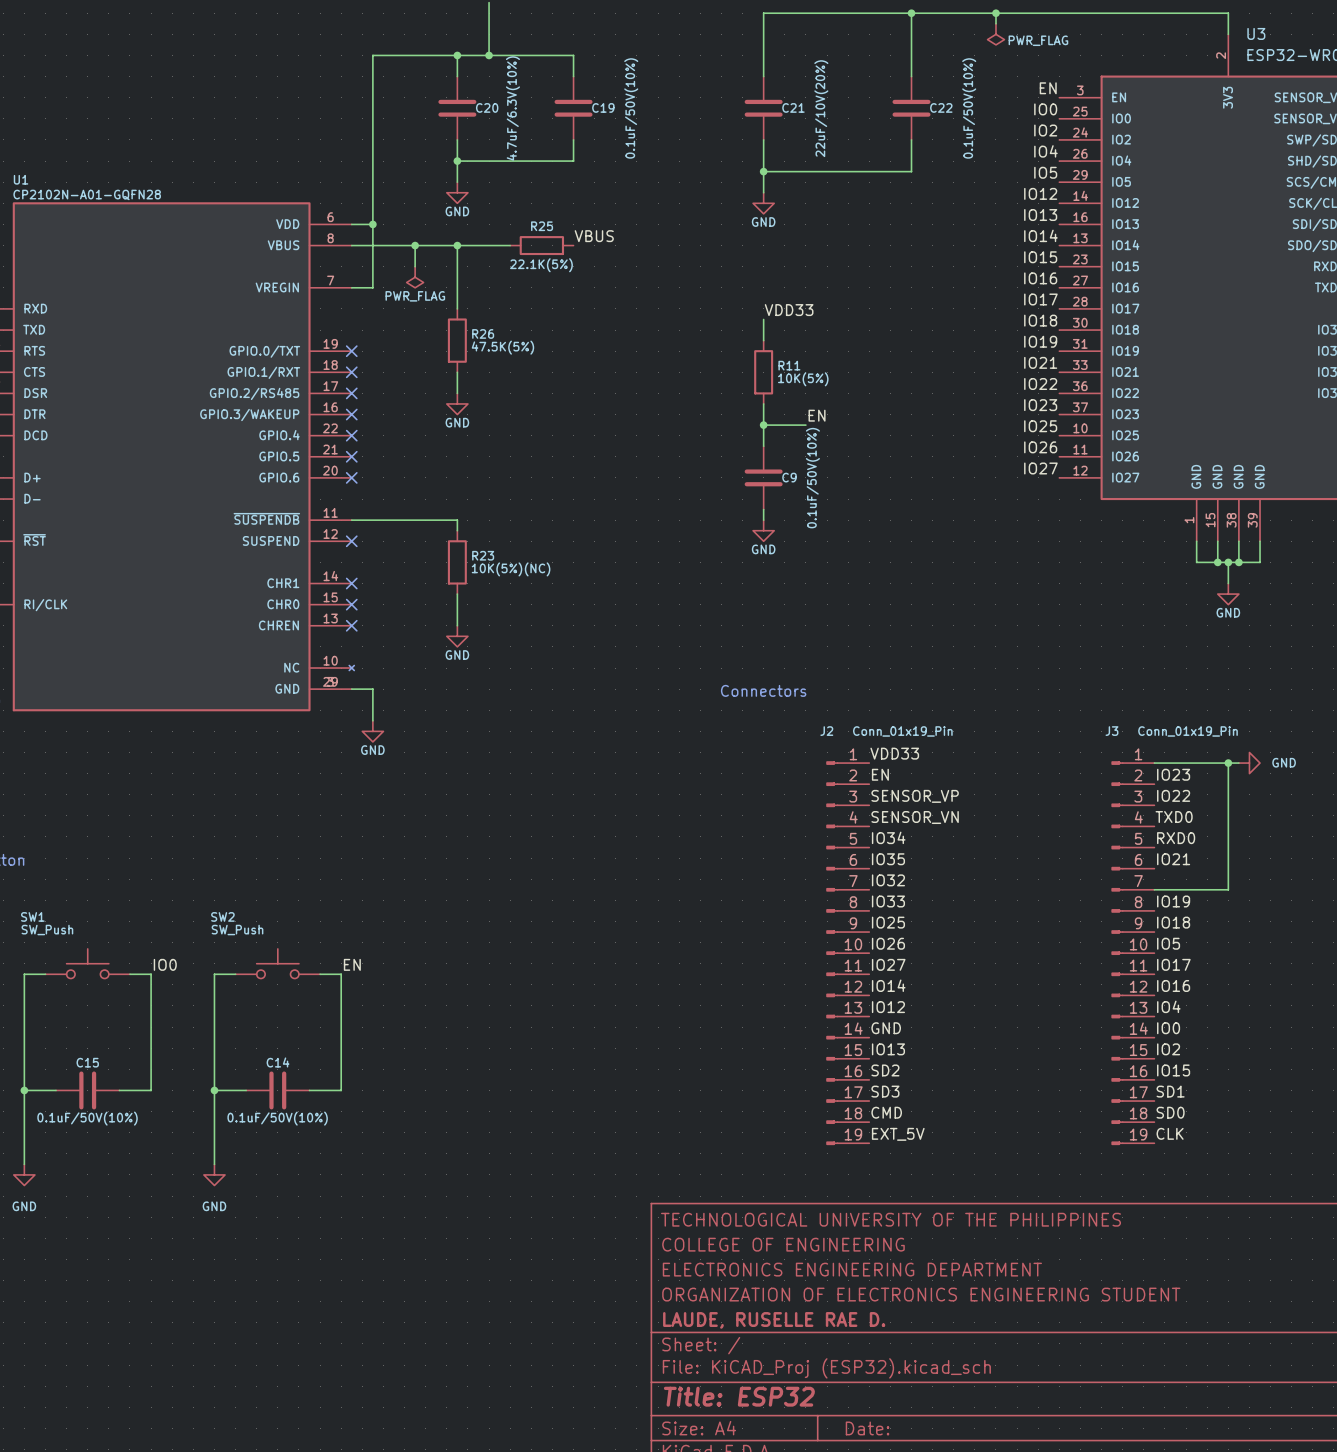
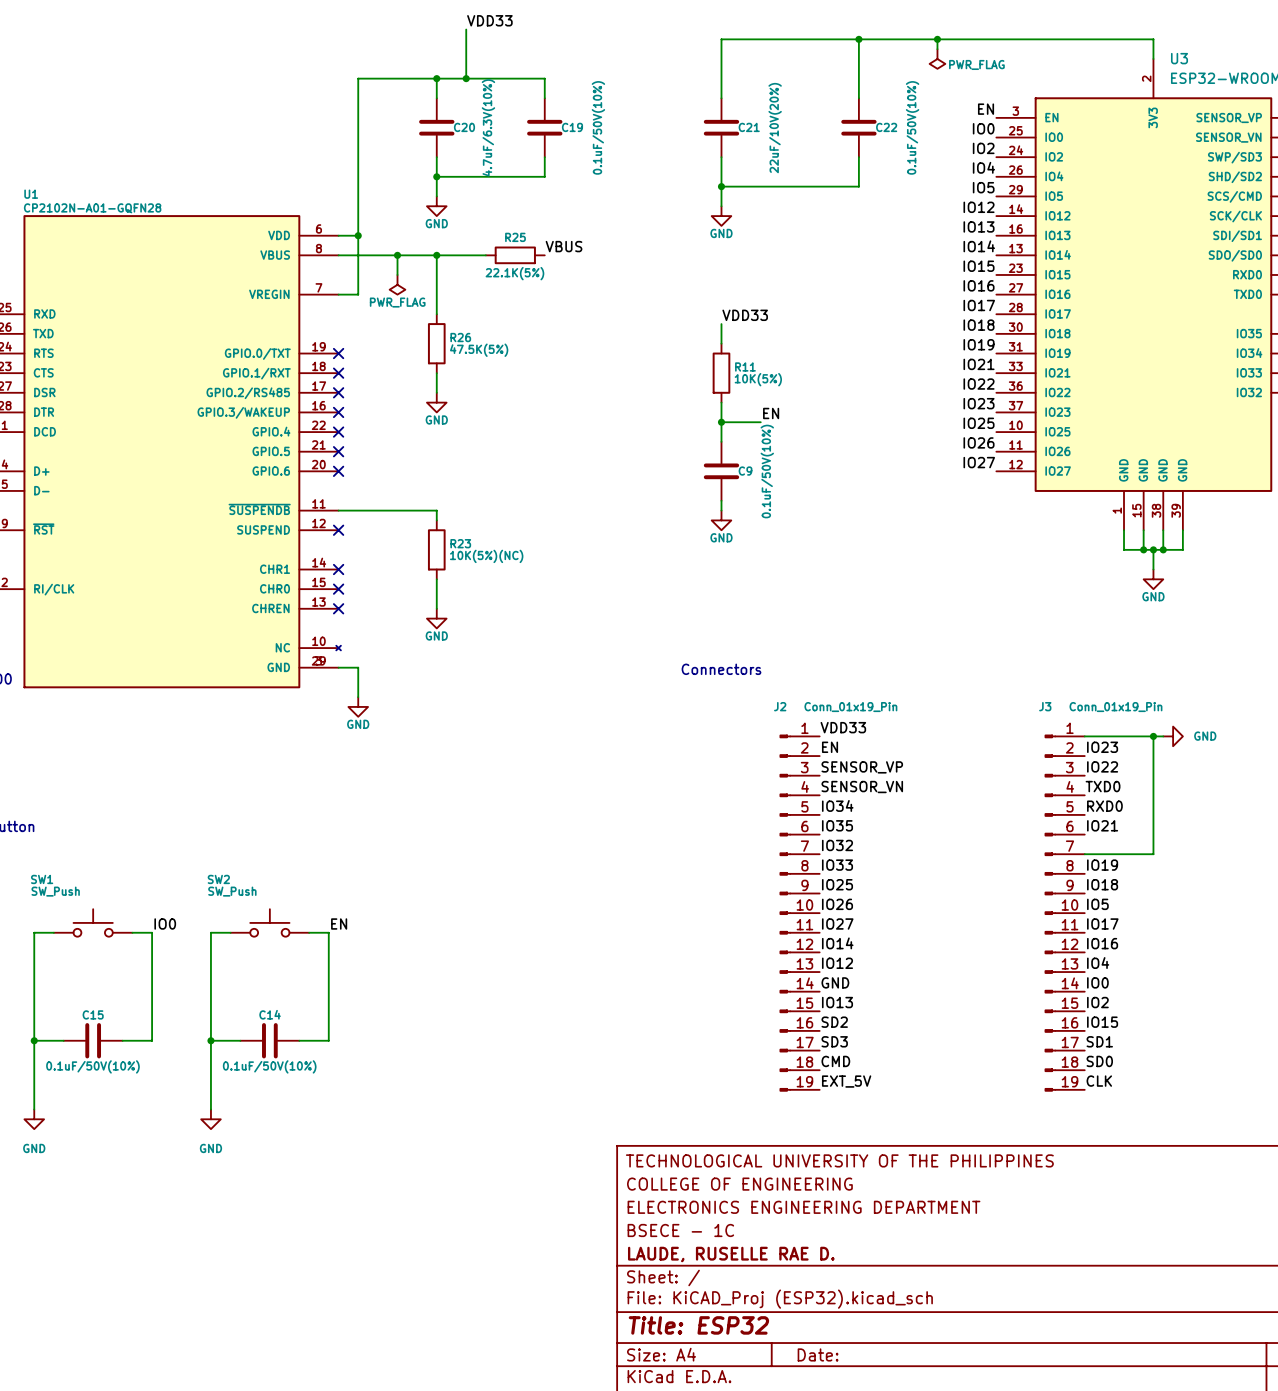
title block: ORGANIZATION OF ELECTRONICS ENGINEERING STUDENT (921, 1294) -> BSECE - 1C (680, 1230)

